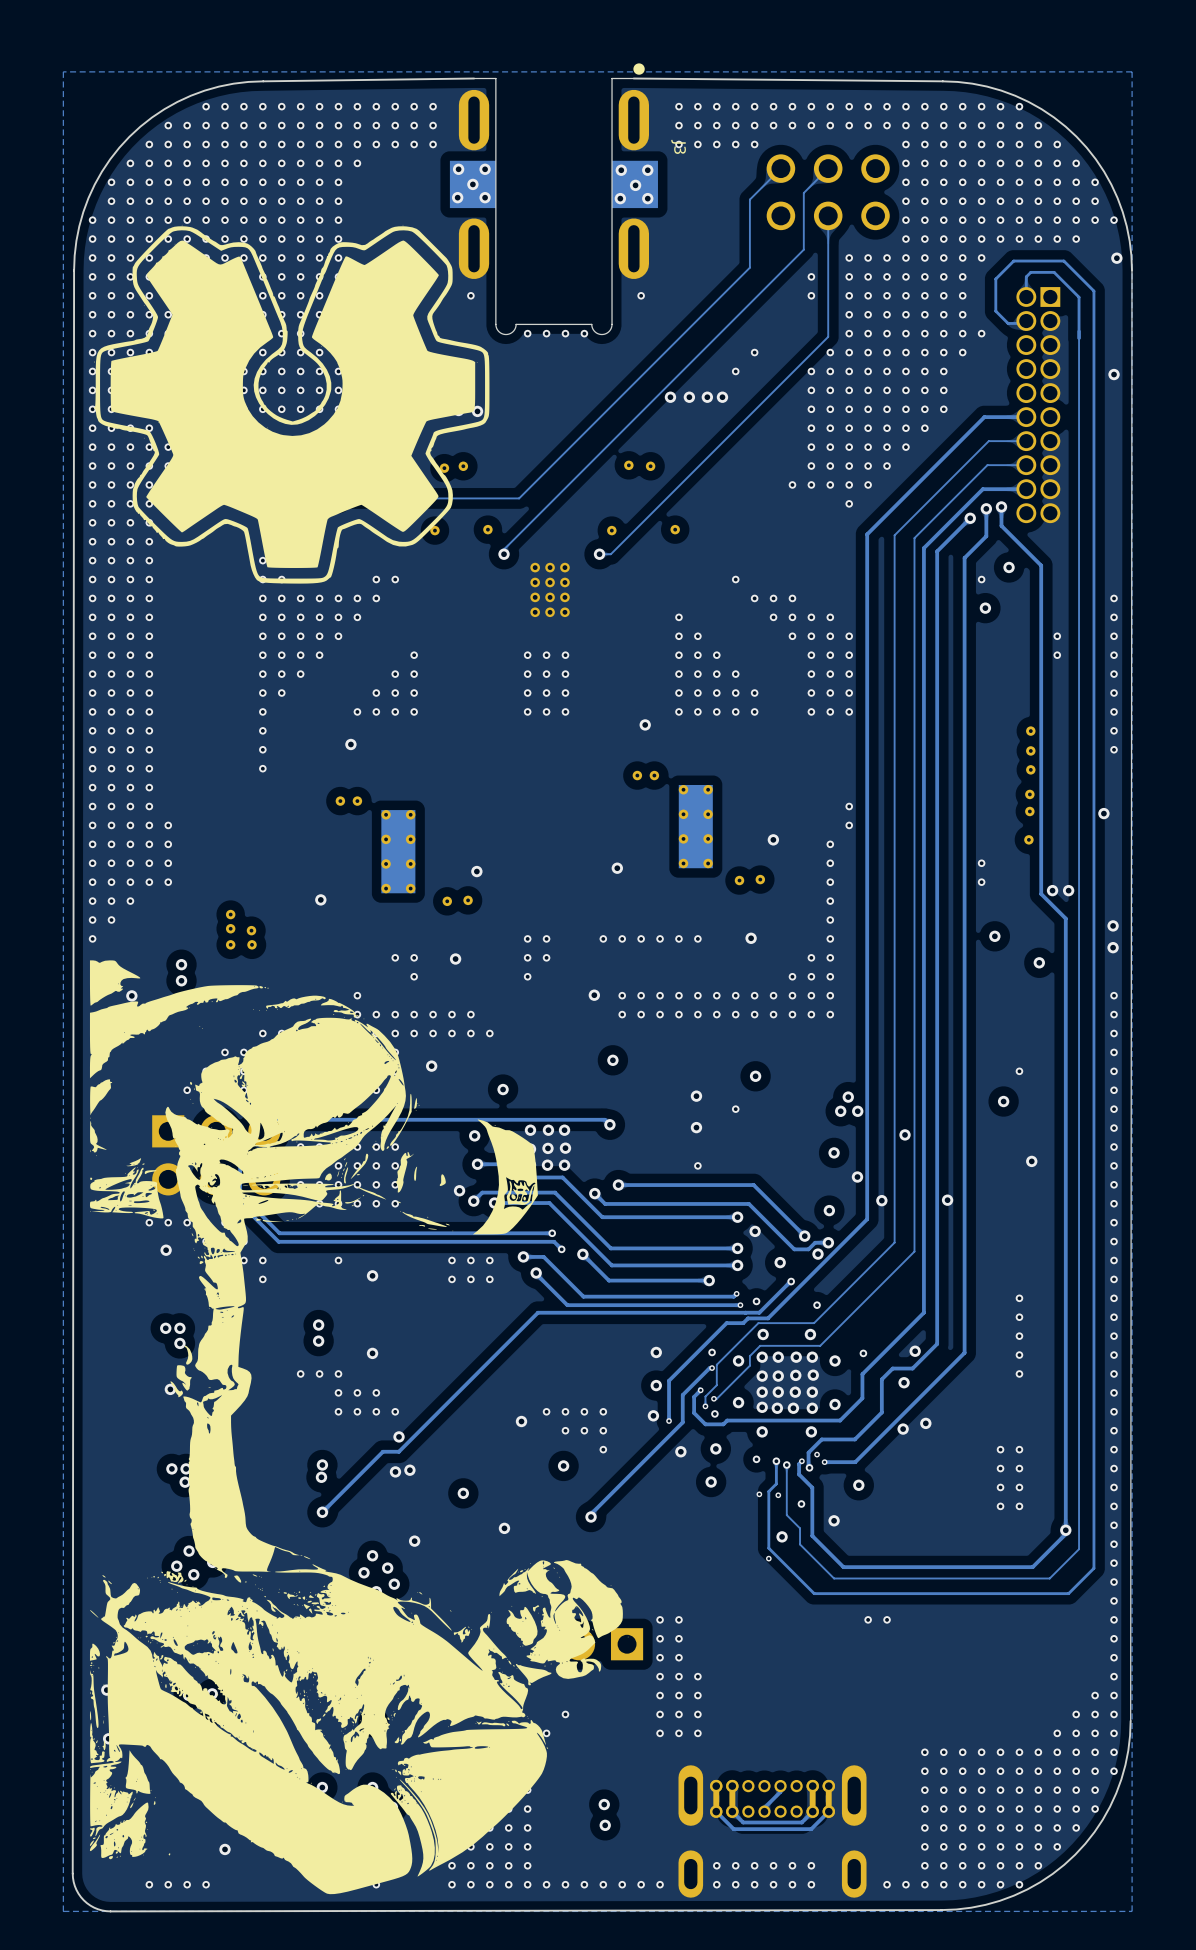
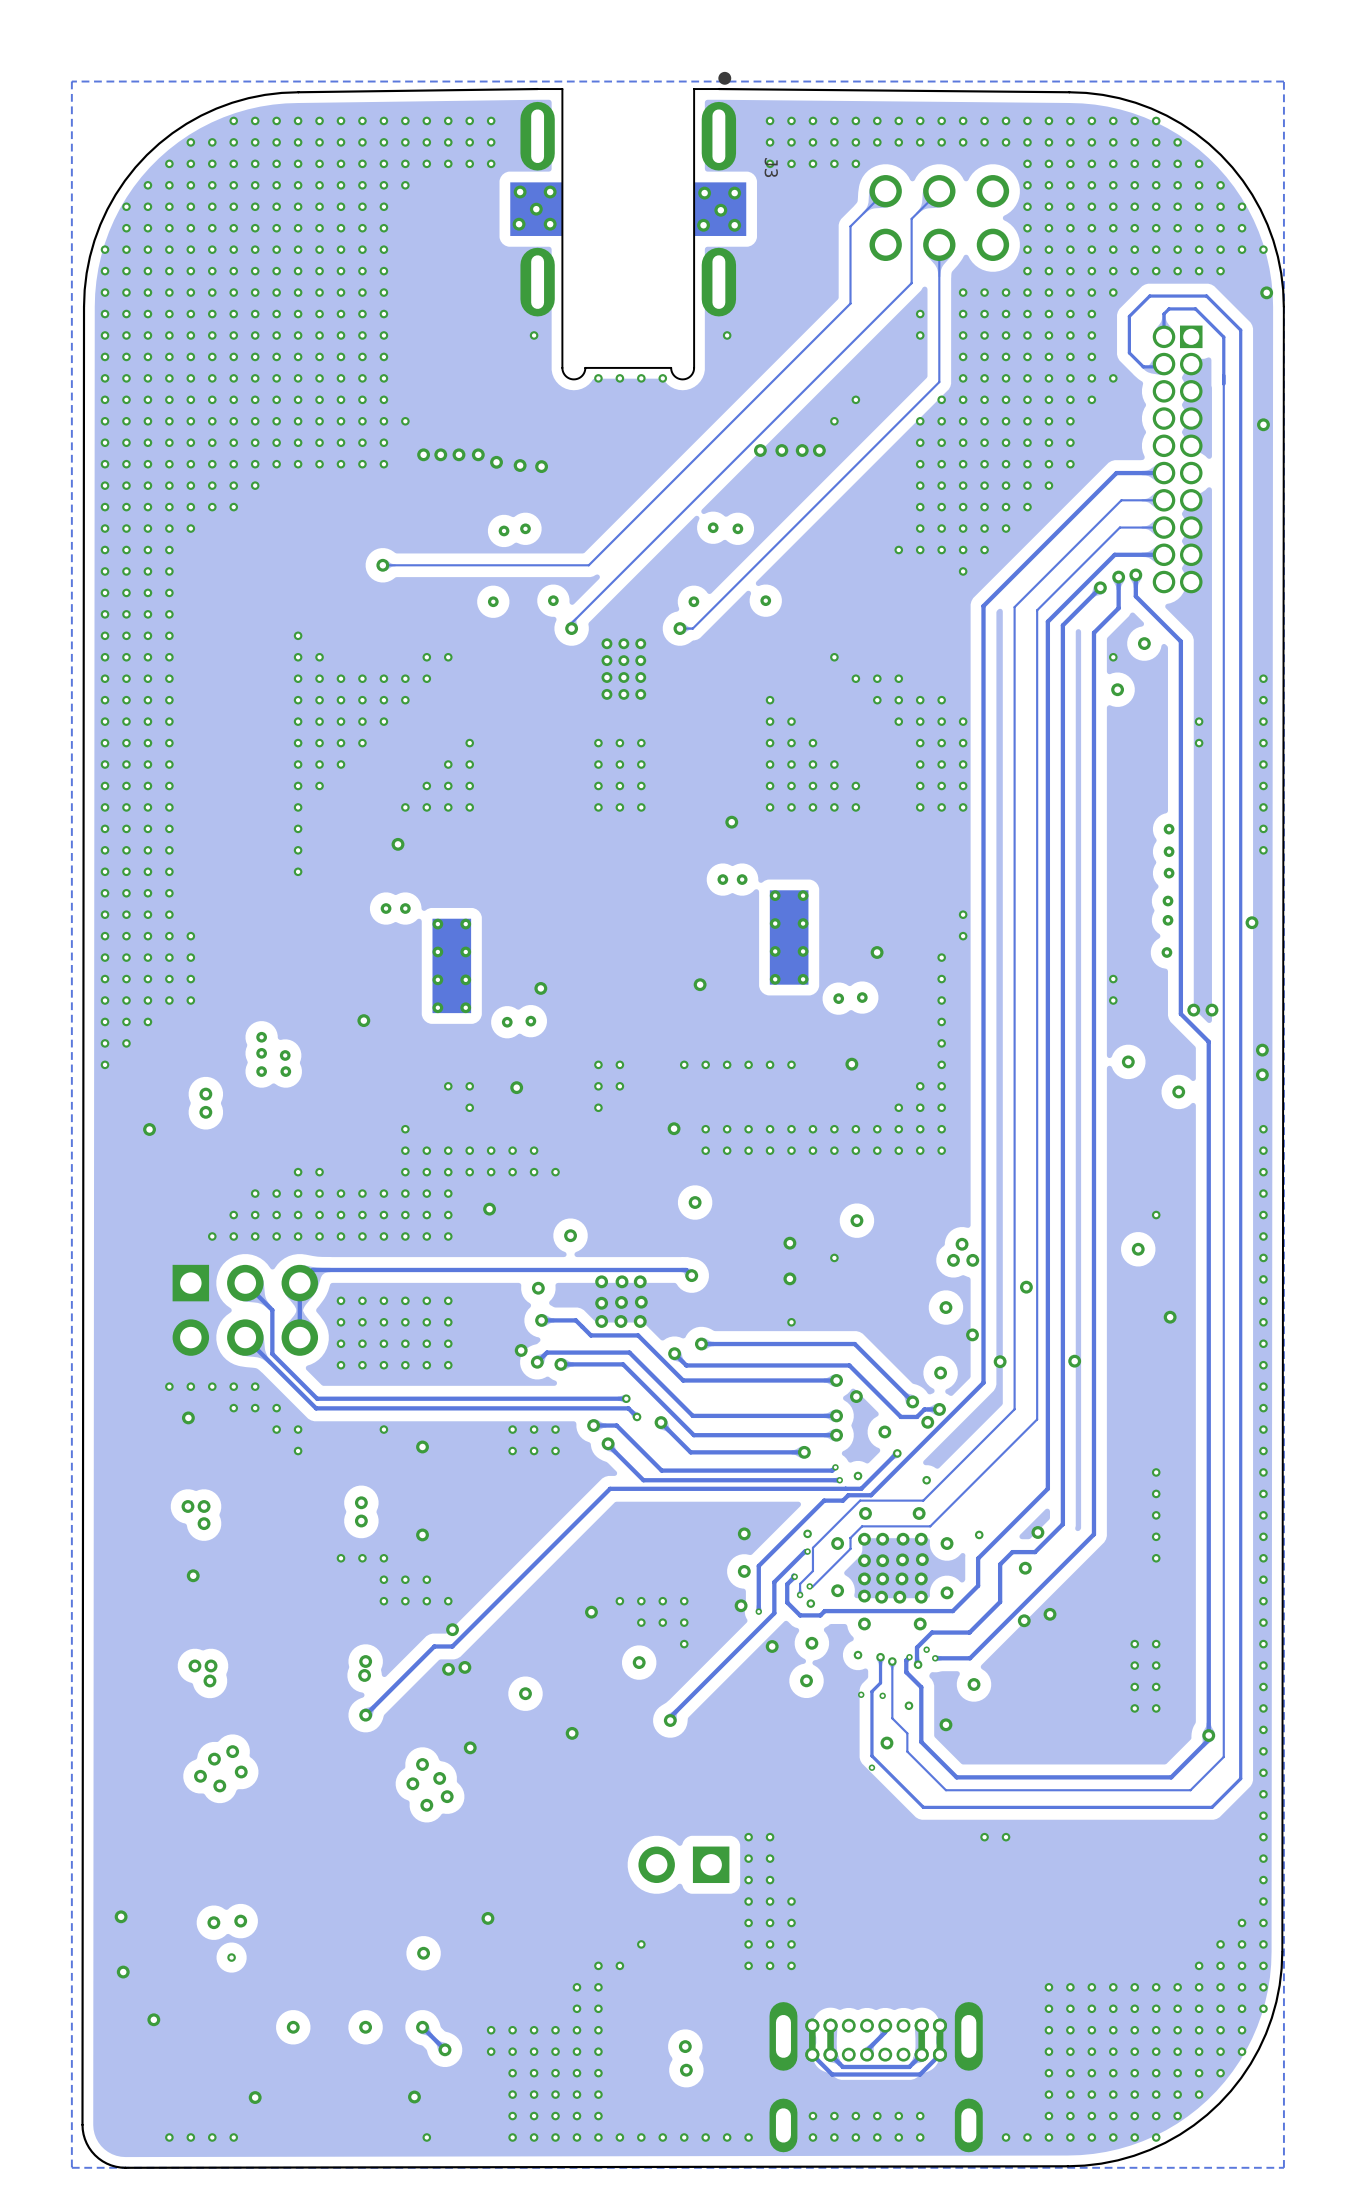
drawing: [94, 224, 490, 584] -> none
drawing: [89, 960, 629, 1895] -> none

